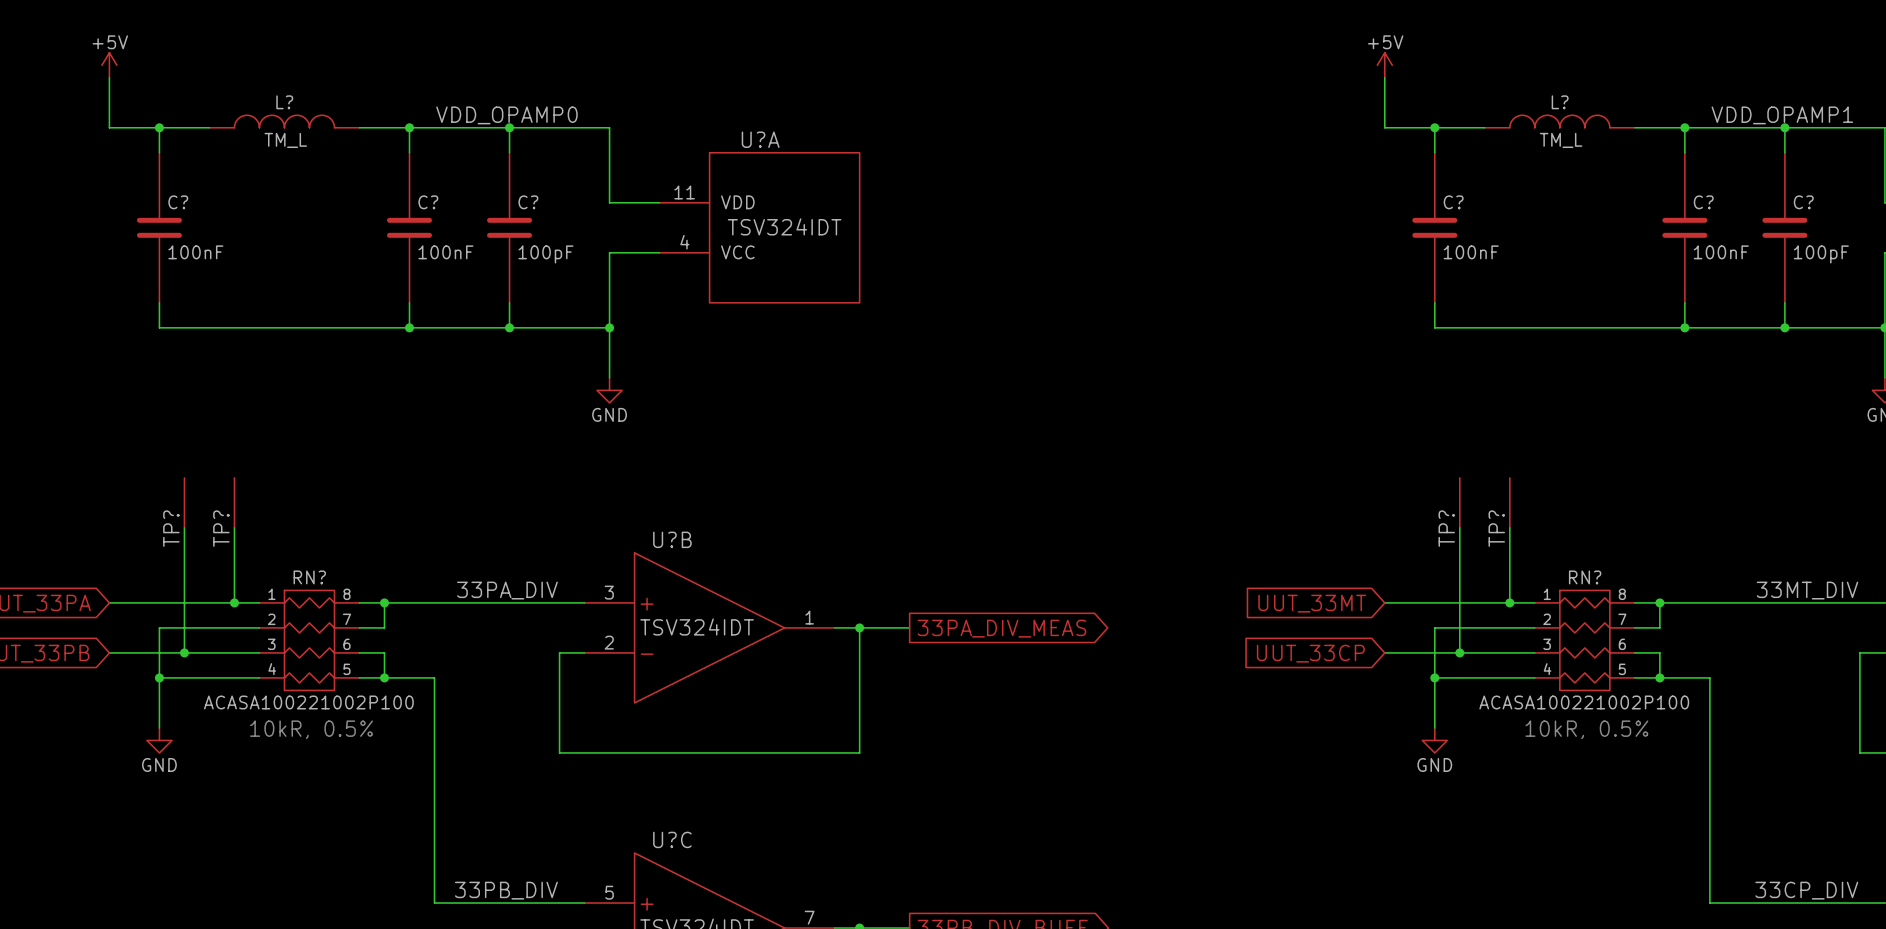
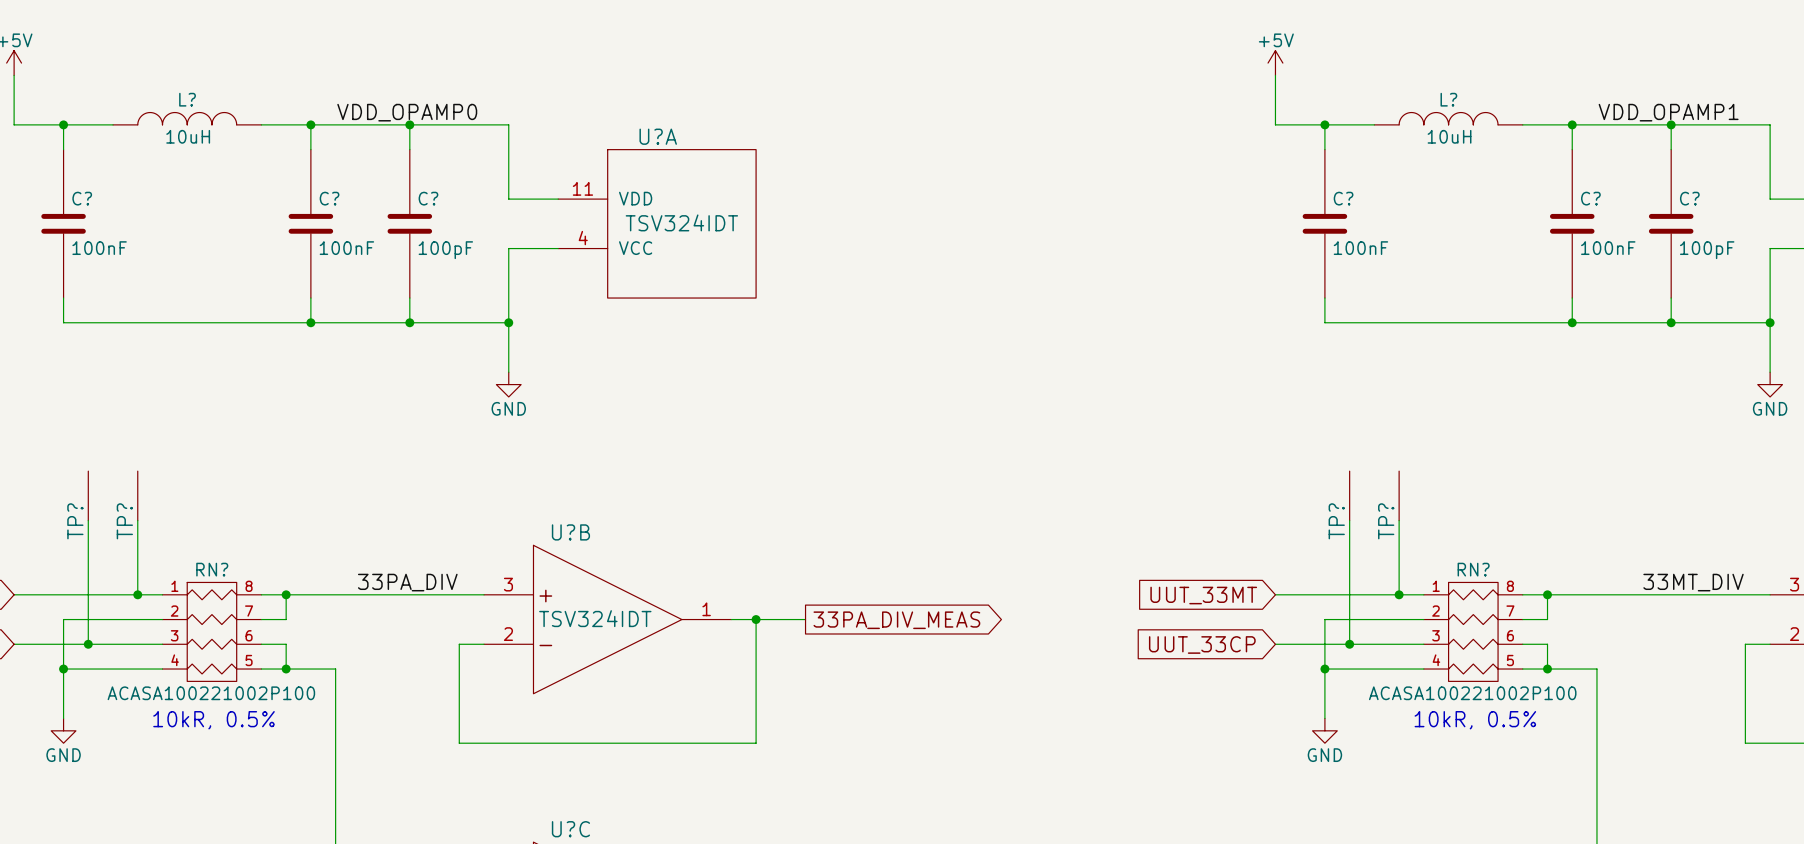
L? value: TM_L (285, 140) -> 10uH (188, 136)
L? value: TM_L (1561, 140) -> 10uH (1449, 136)

